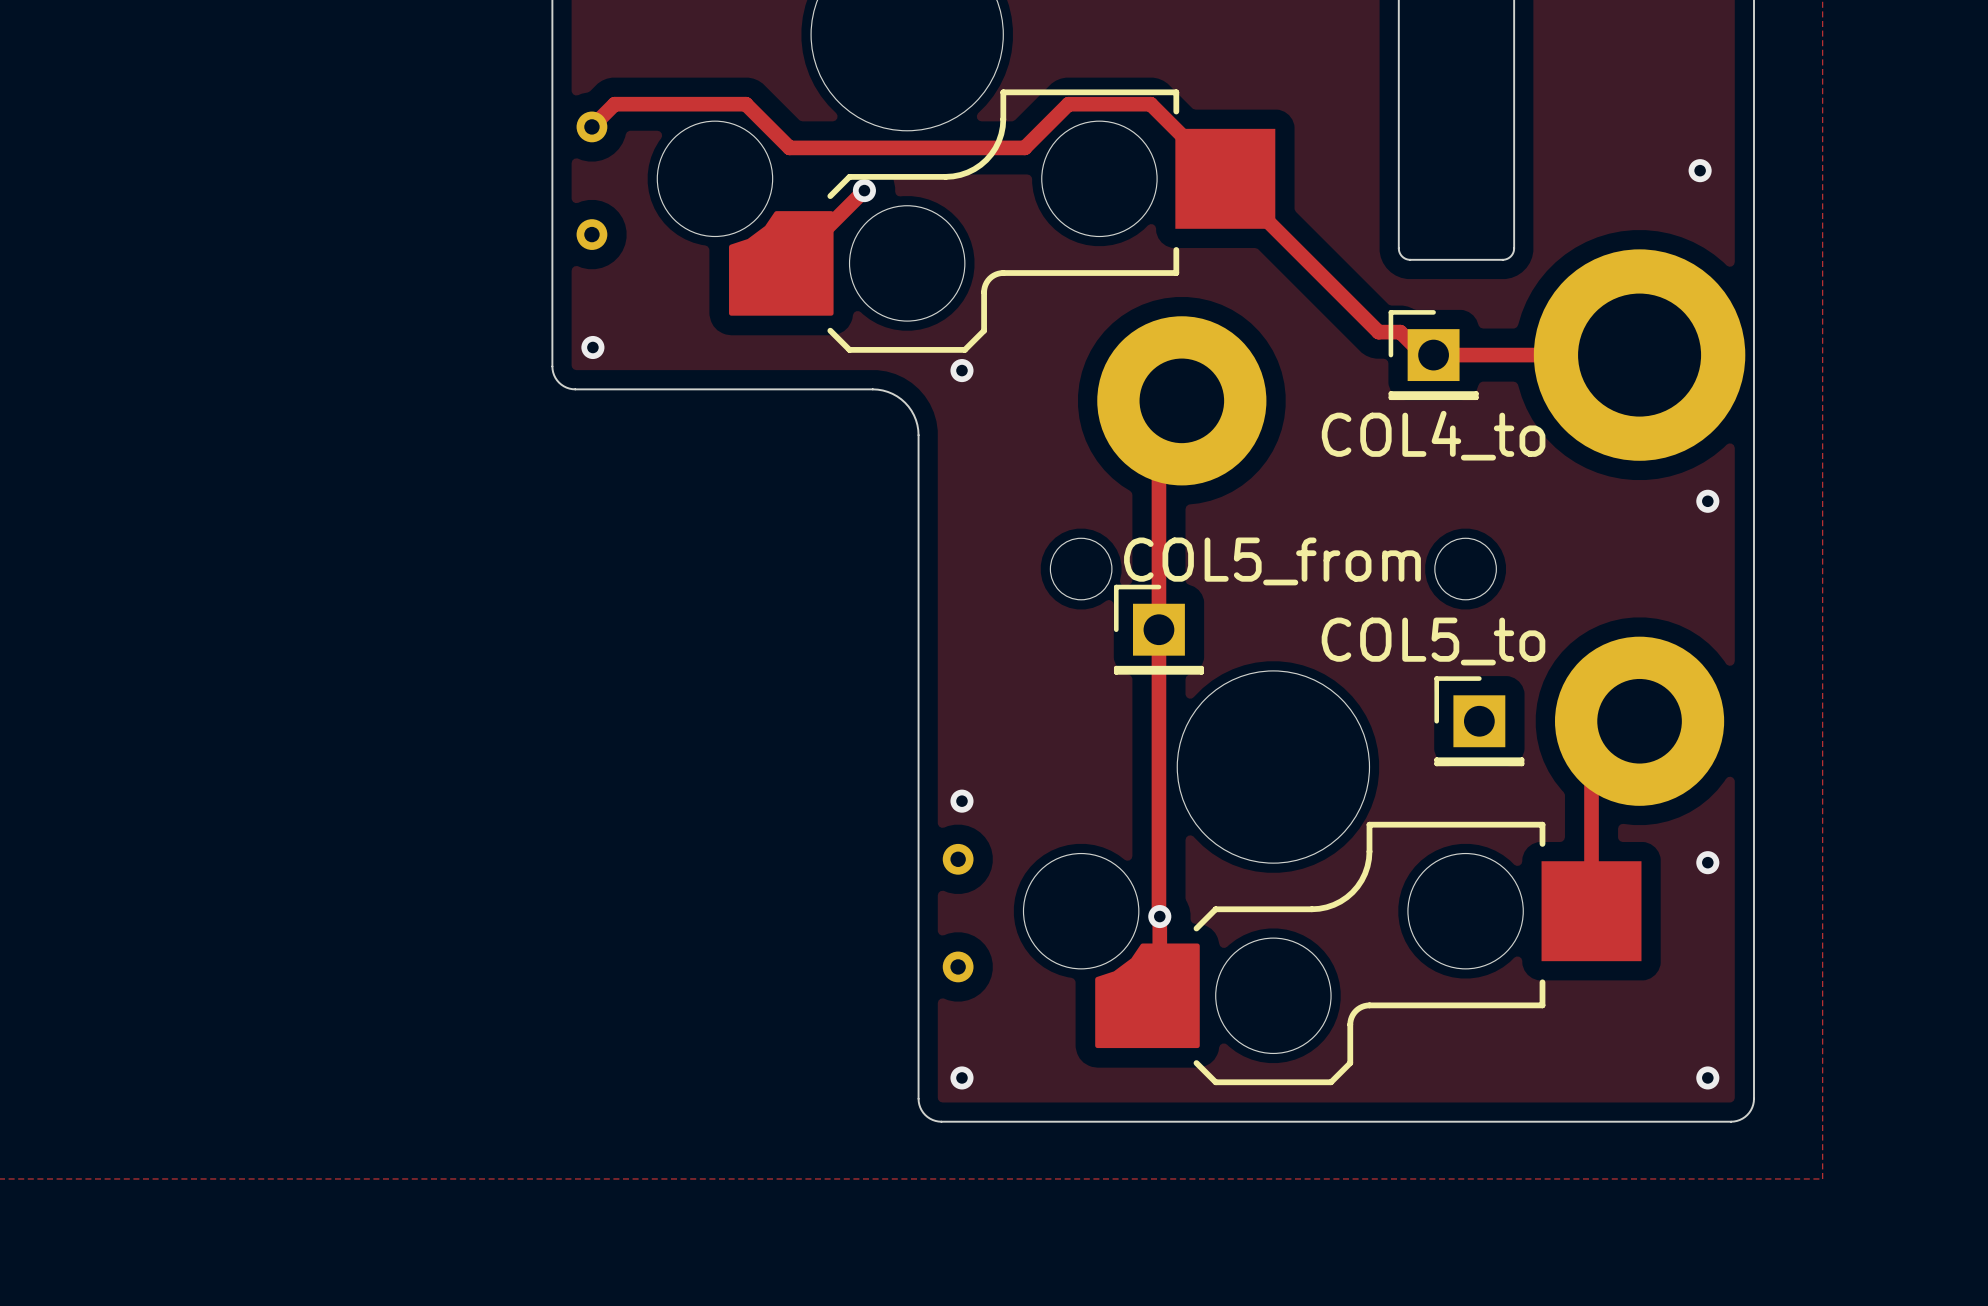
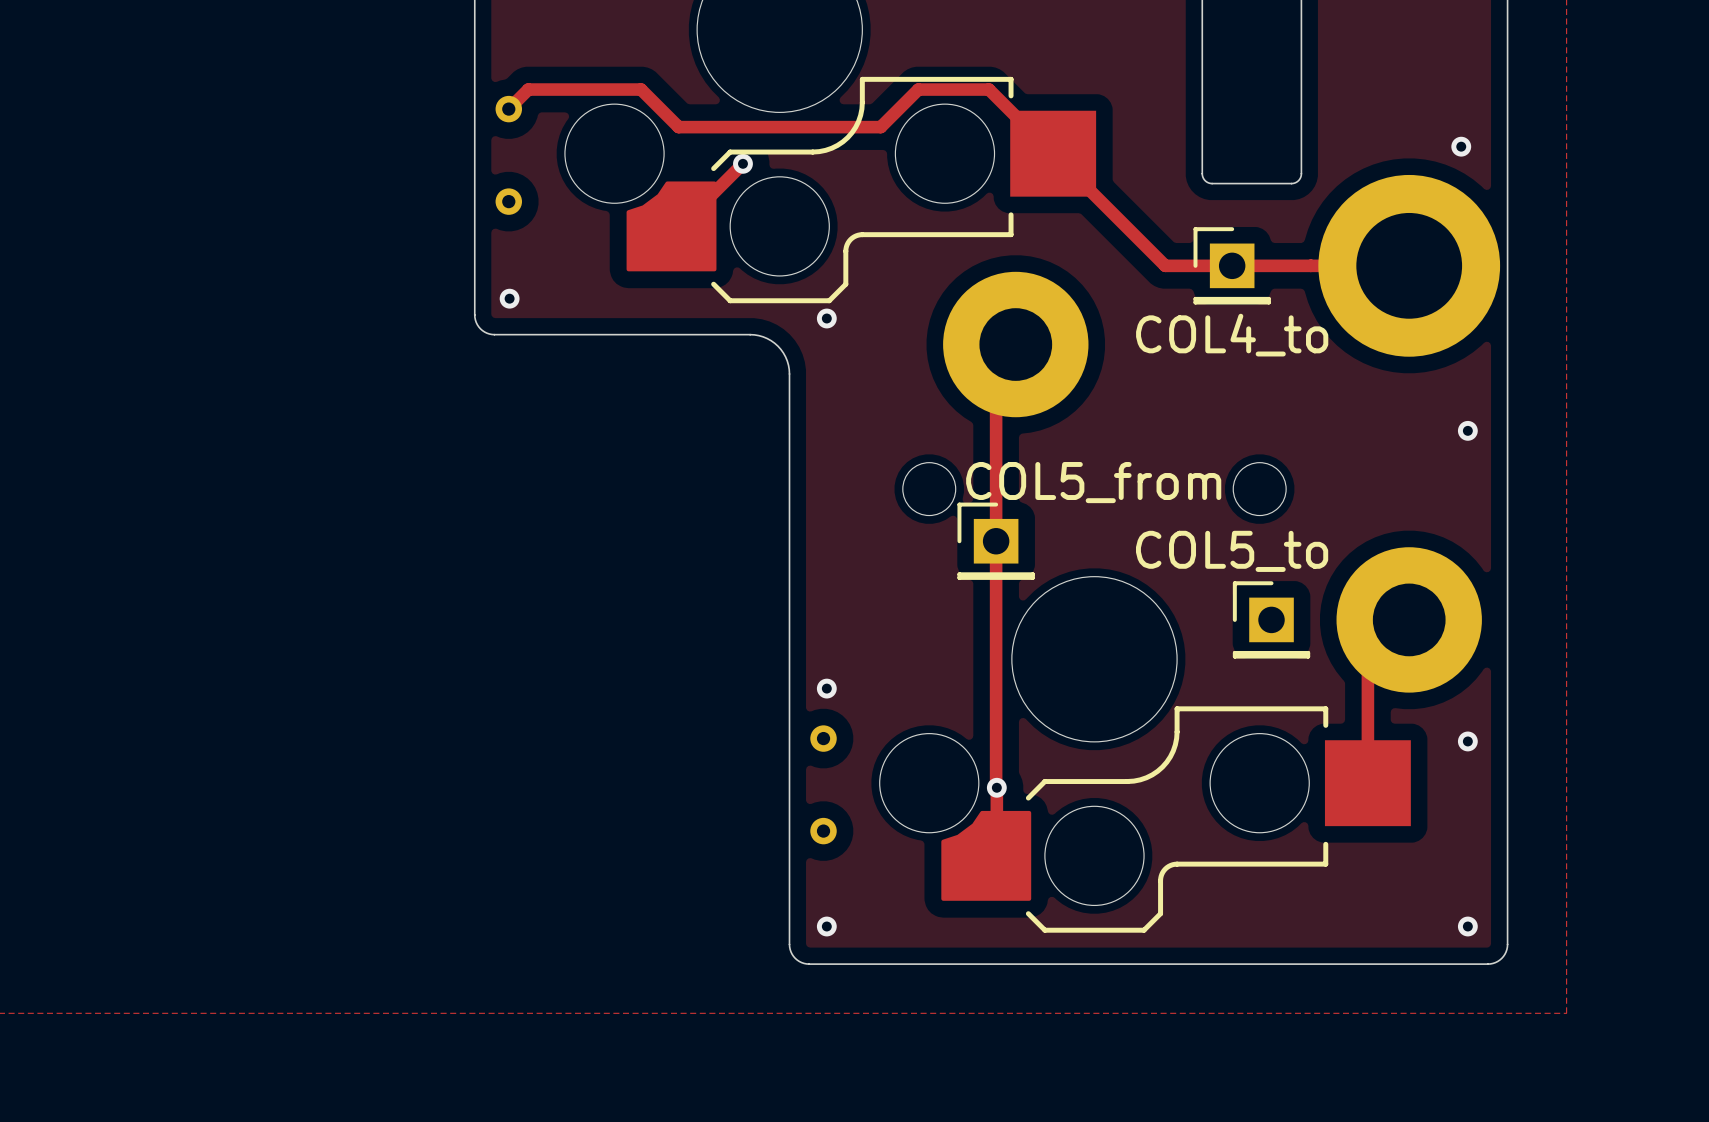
board edge: (1398, 202) (1398, 249) (1403, 257) (1410, 259) (1508, 258) (1514, 249) (1514, 202) -> (1202, 173) (1205, 180) (1212, 183) (1292, 183) (1299, 179) (1301, 173)
track: (1355, 309) (1378, 332) (1400, 332) (1423, 355) (1639, 355) -> (1165, 265) (1409, 265)
part position: (1433, 355) -> (1232, 265)
part position: (1639, 355) -> (1409, 265)

